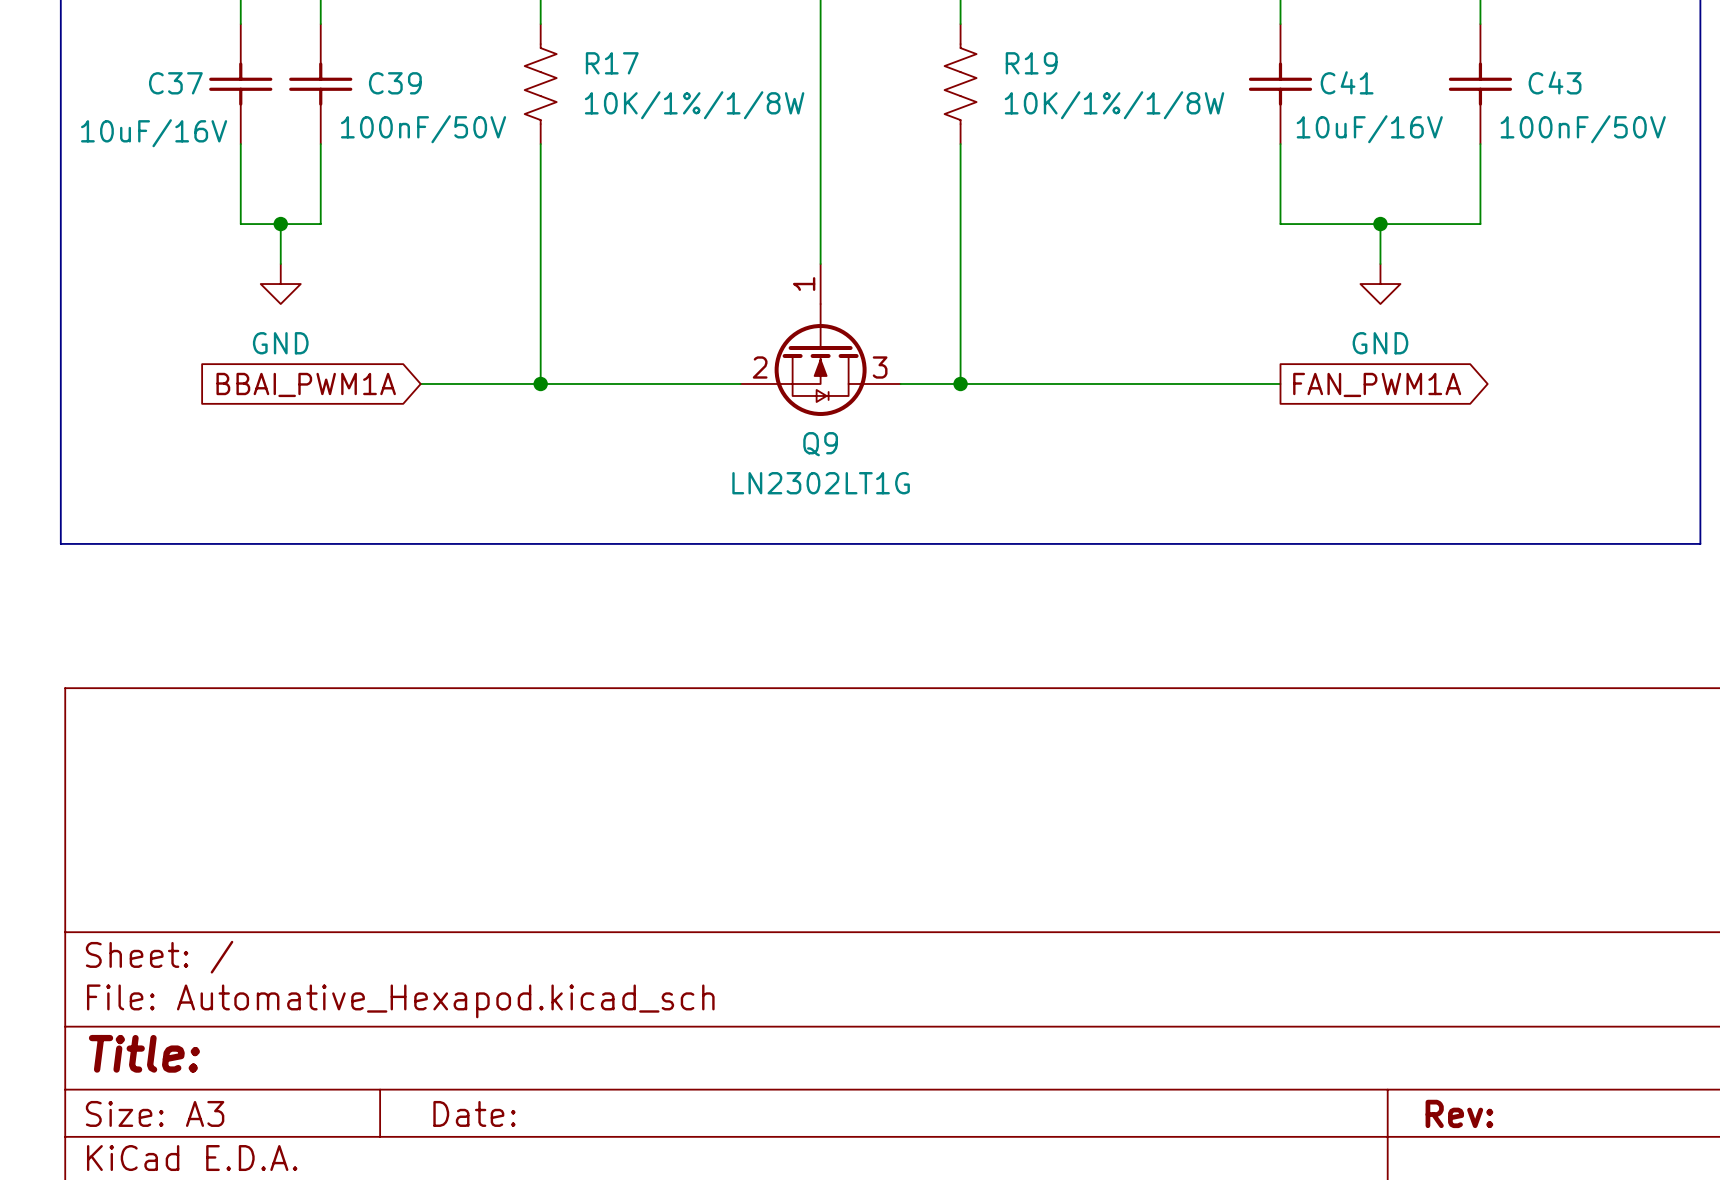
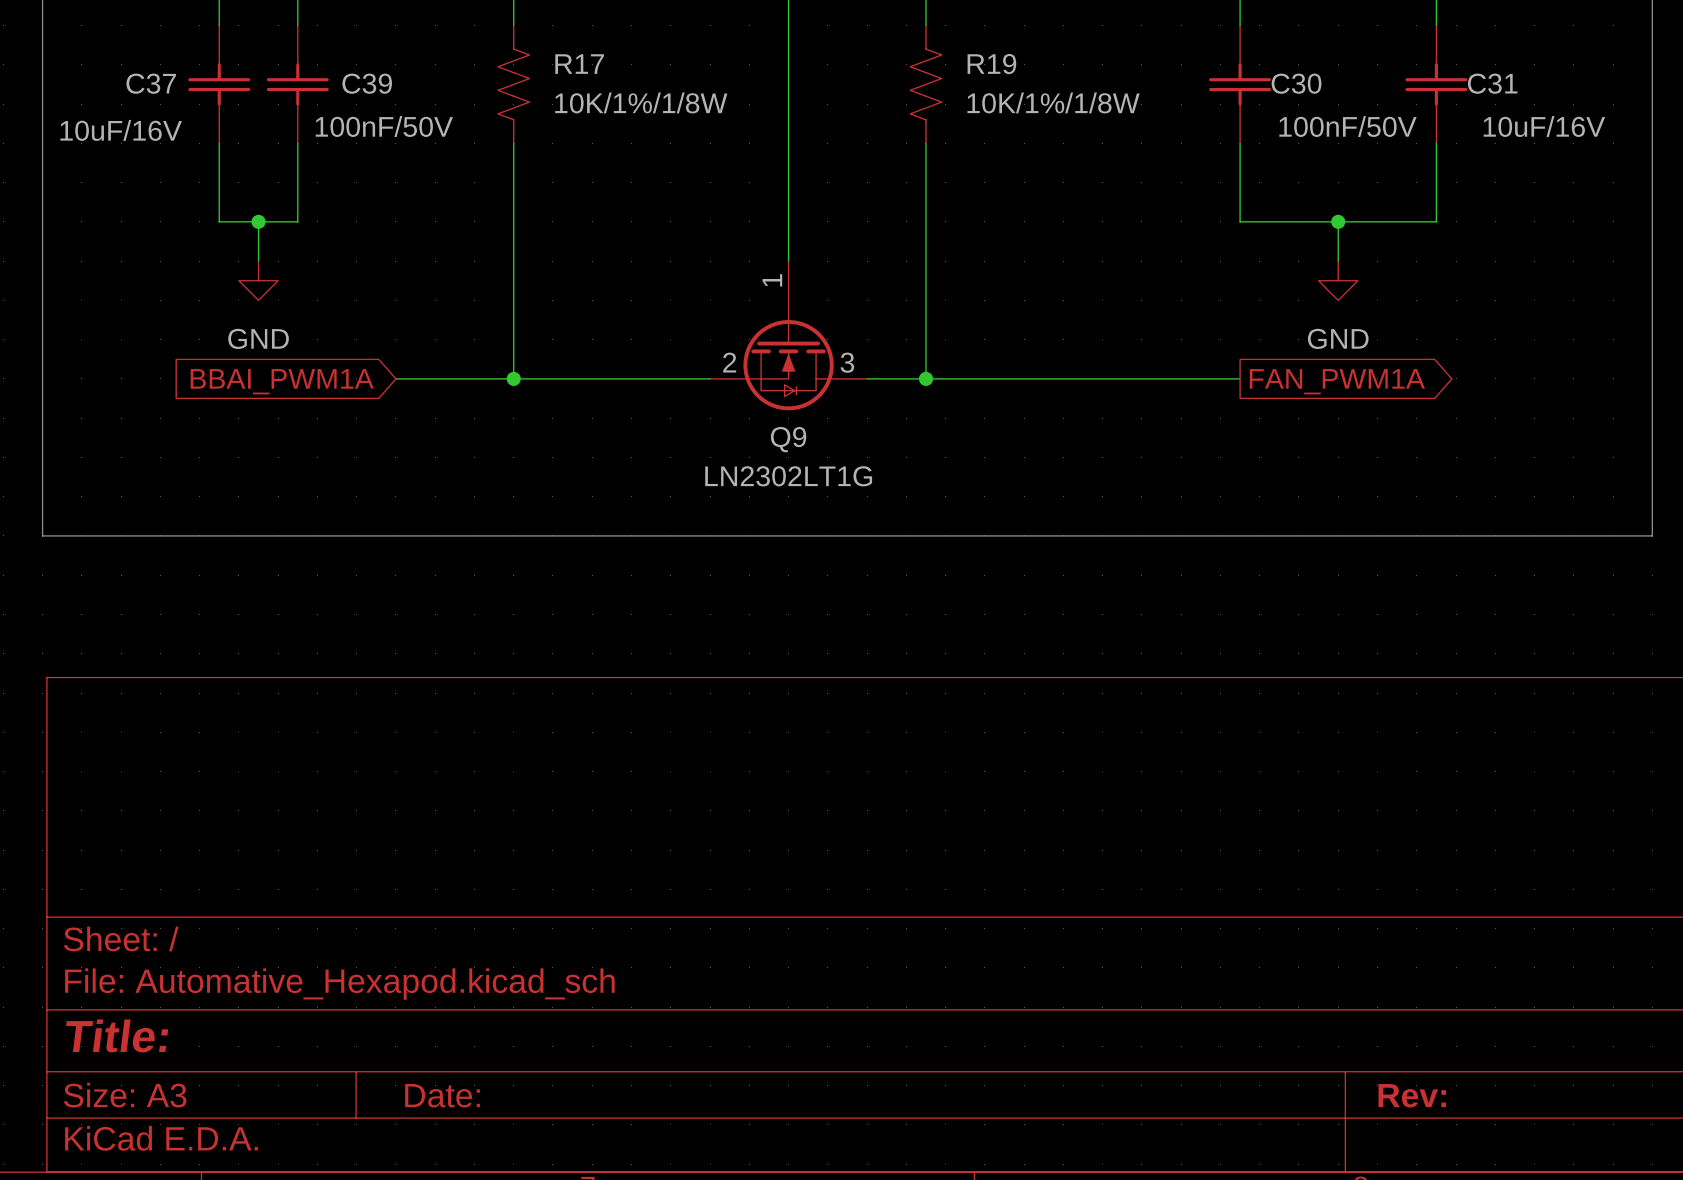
C41 name: C41 (1347, 82) -> C30 (1296, 83)
C43 name: C43 (1555, 82) -> C31 (1492, 83)
C41 value: 10uF/16V (1369, 129) -> 100nF/50V (1347, 126)
C43 value: 100nF/50V (1583, 129) -> 10uF/16V (1544, 126)

